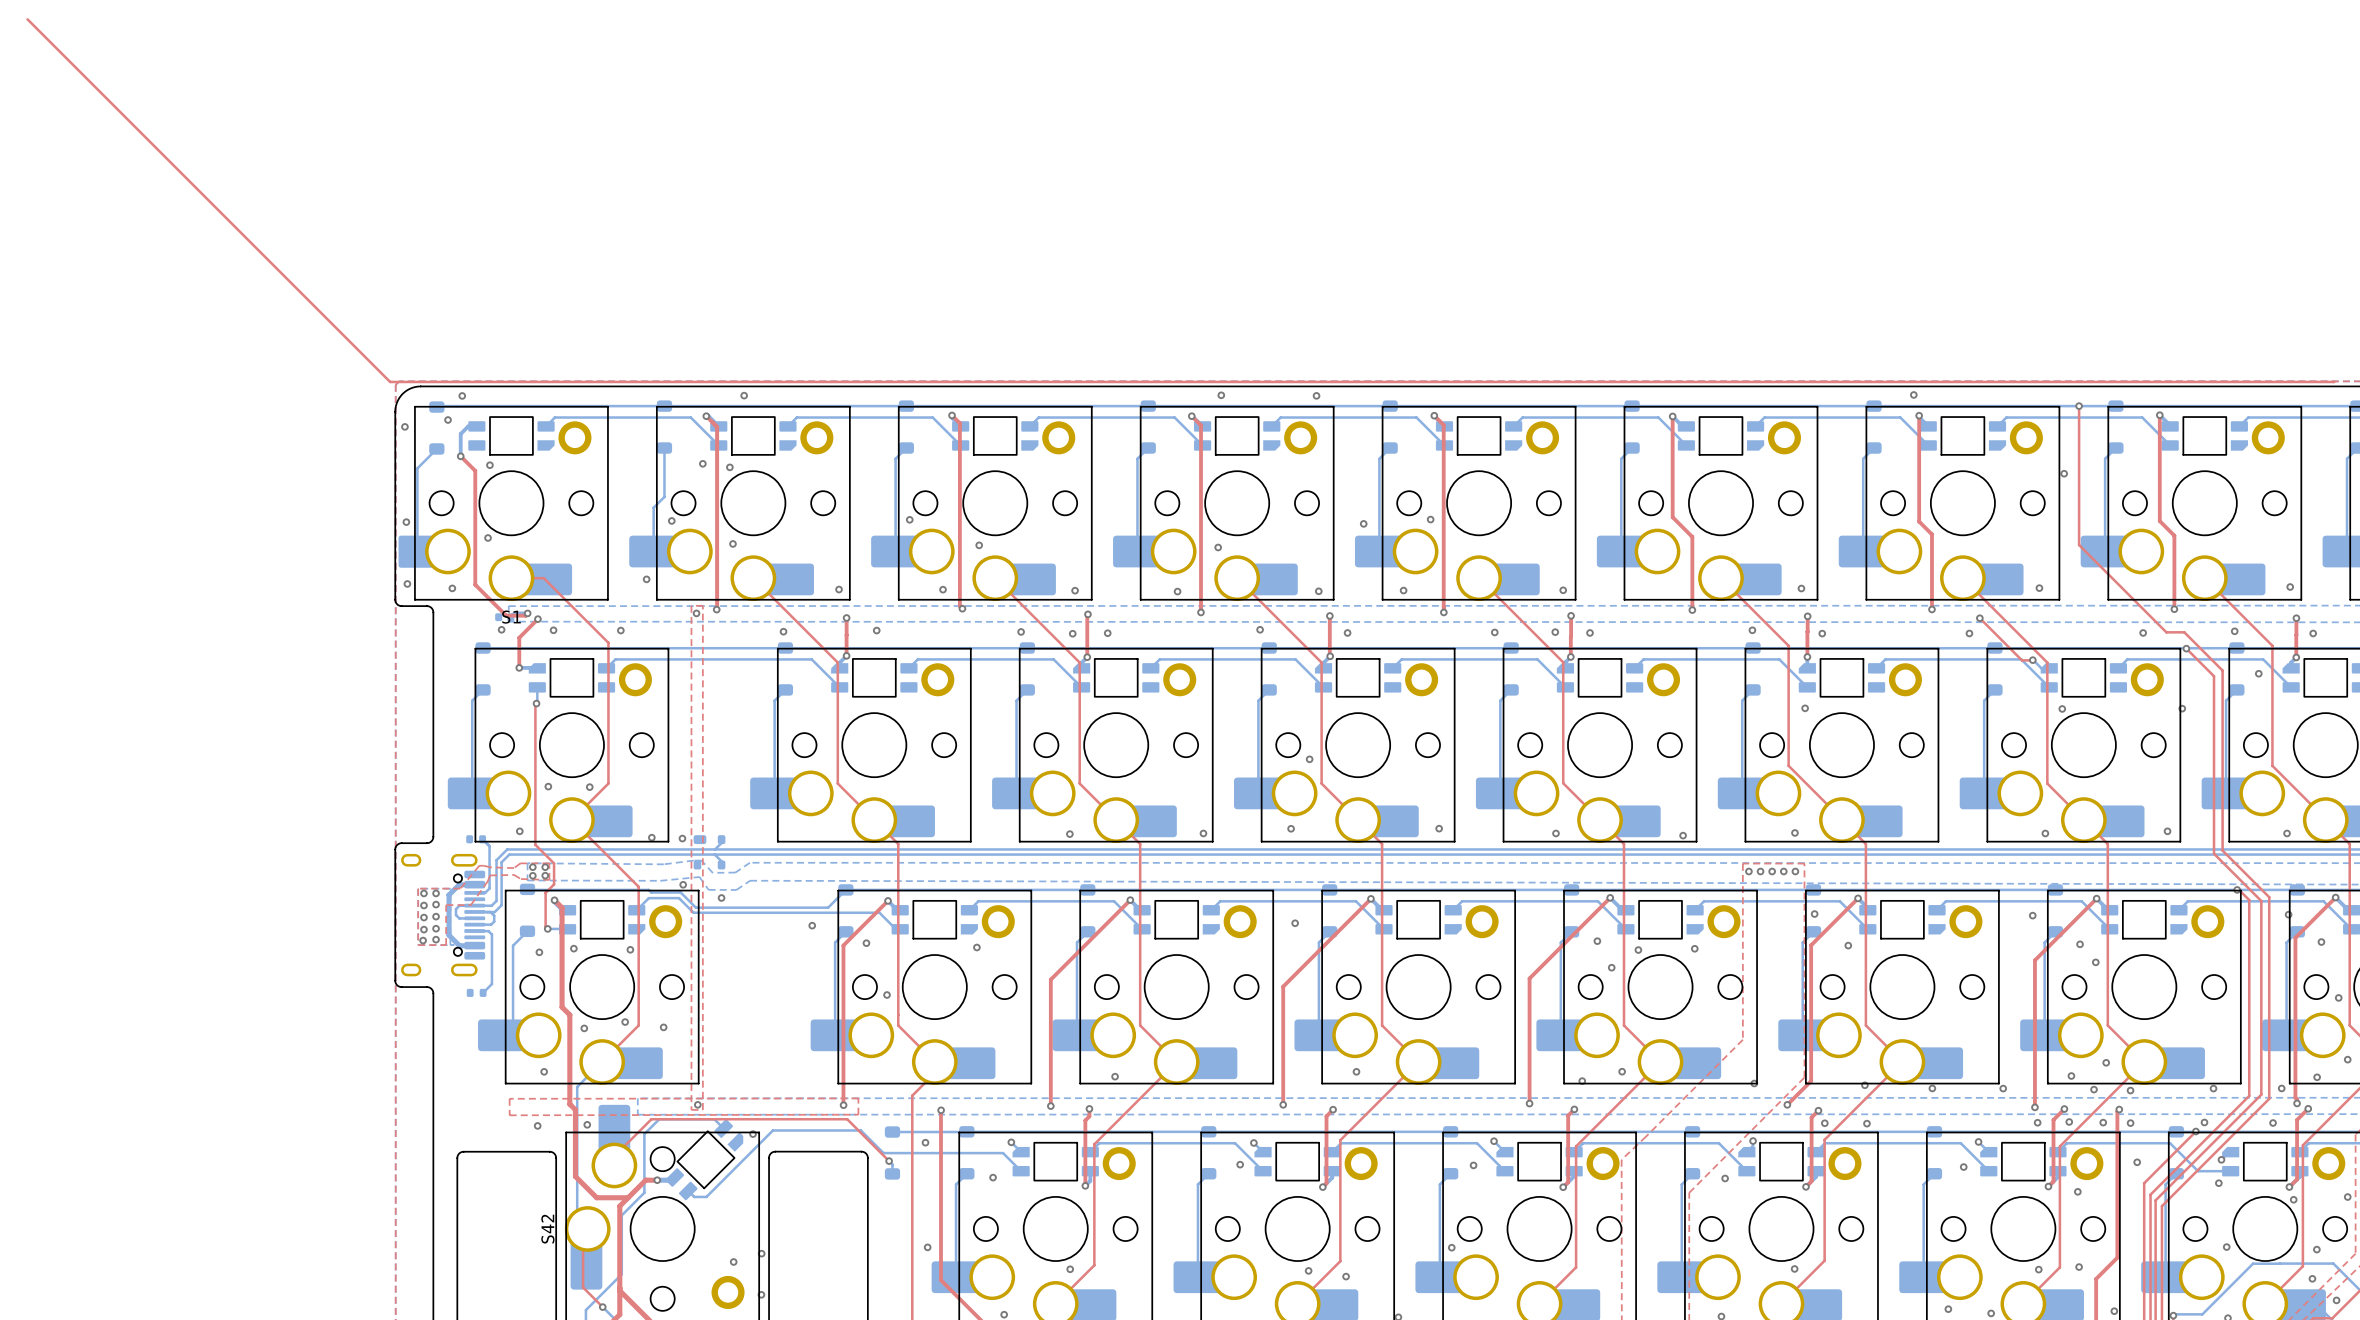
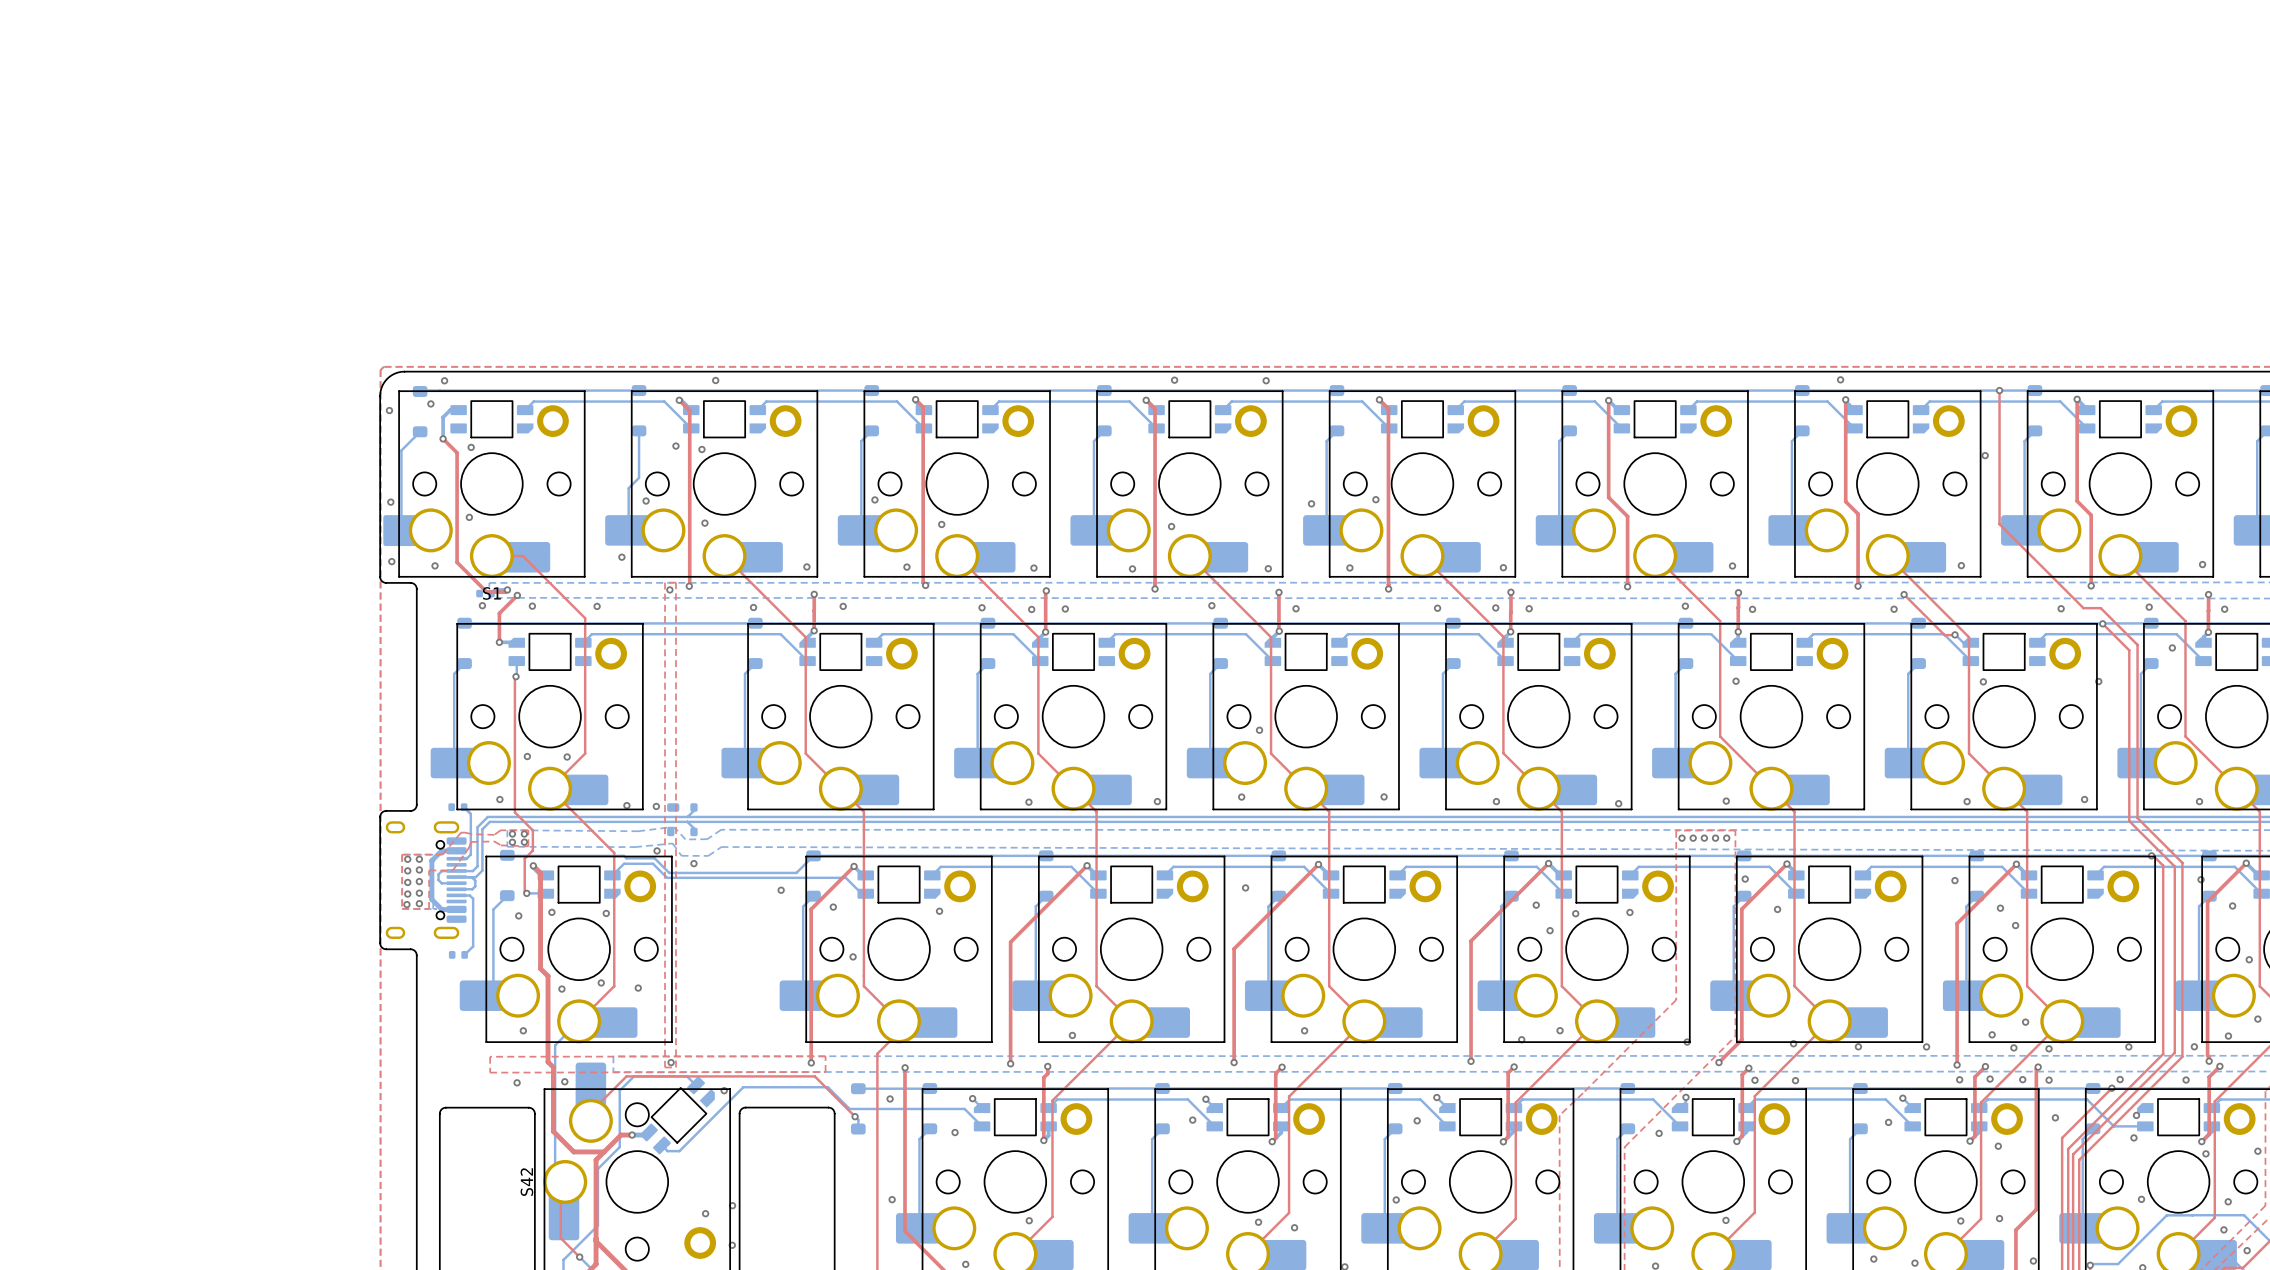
top track: (27, 19) (390, 381) (2334, 381) -> none

